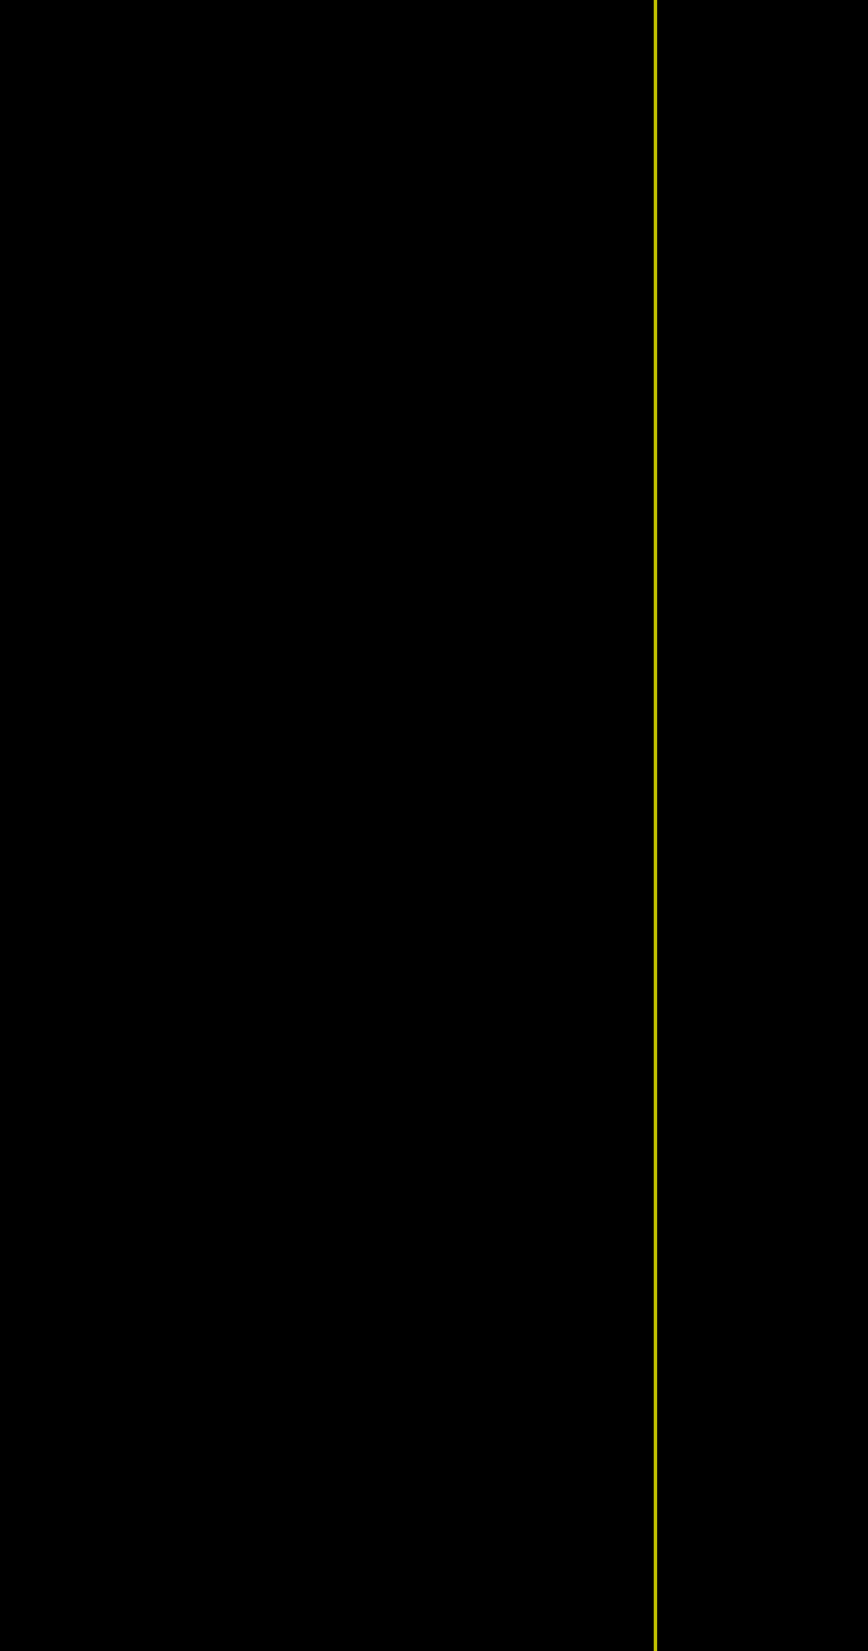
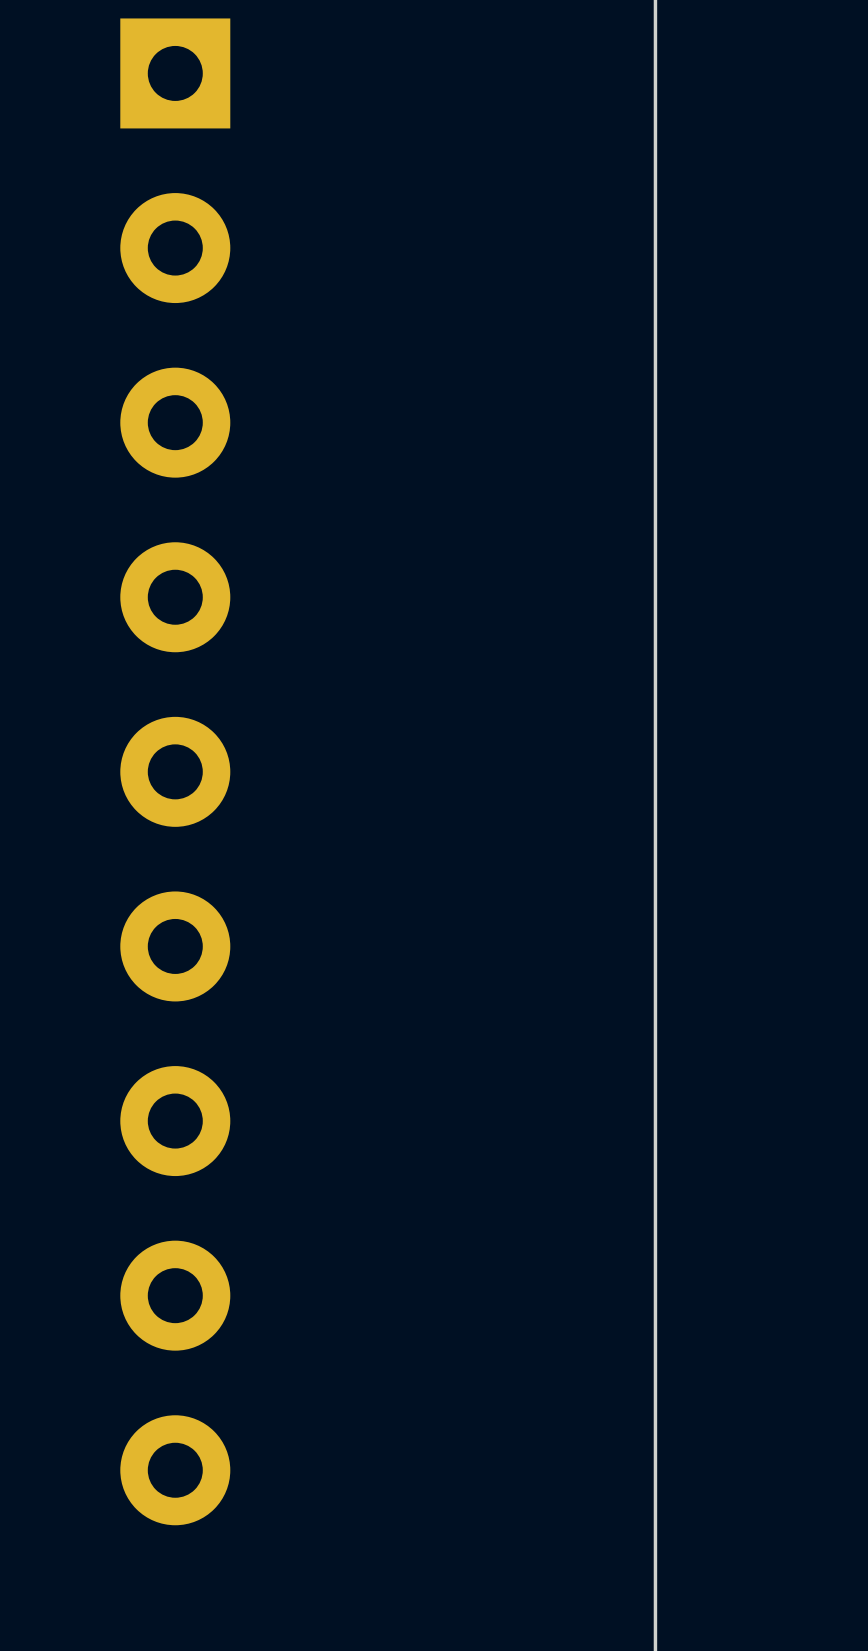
part: none -> (175, 771)

